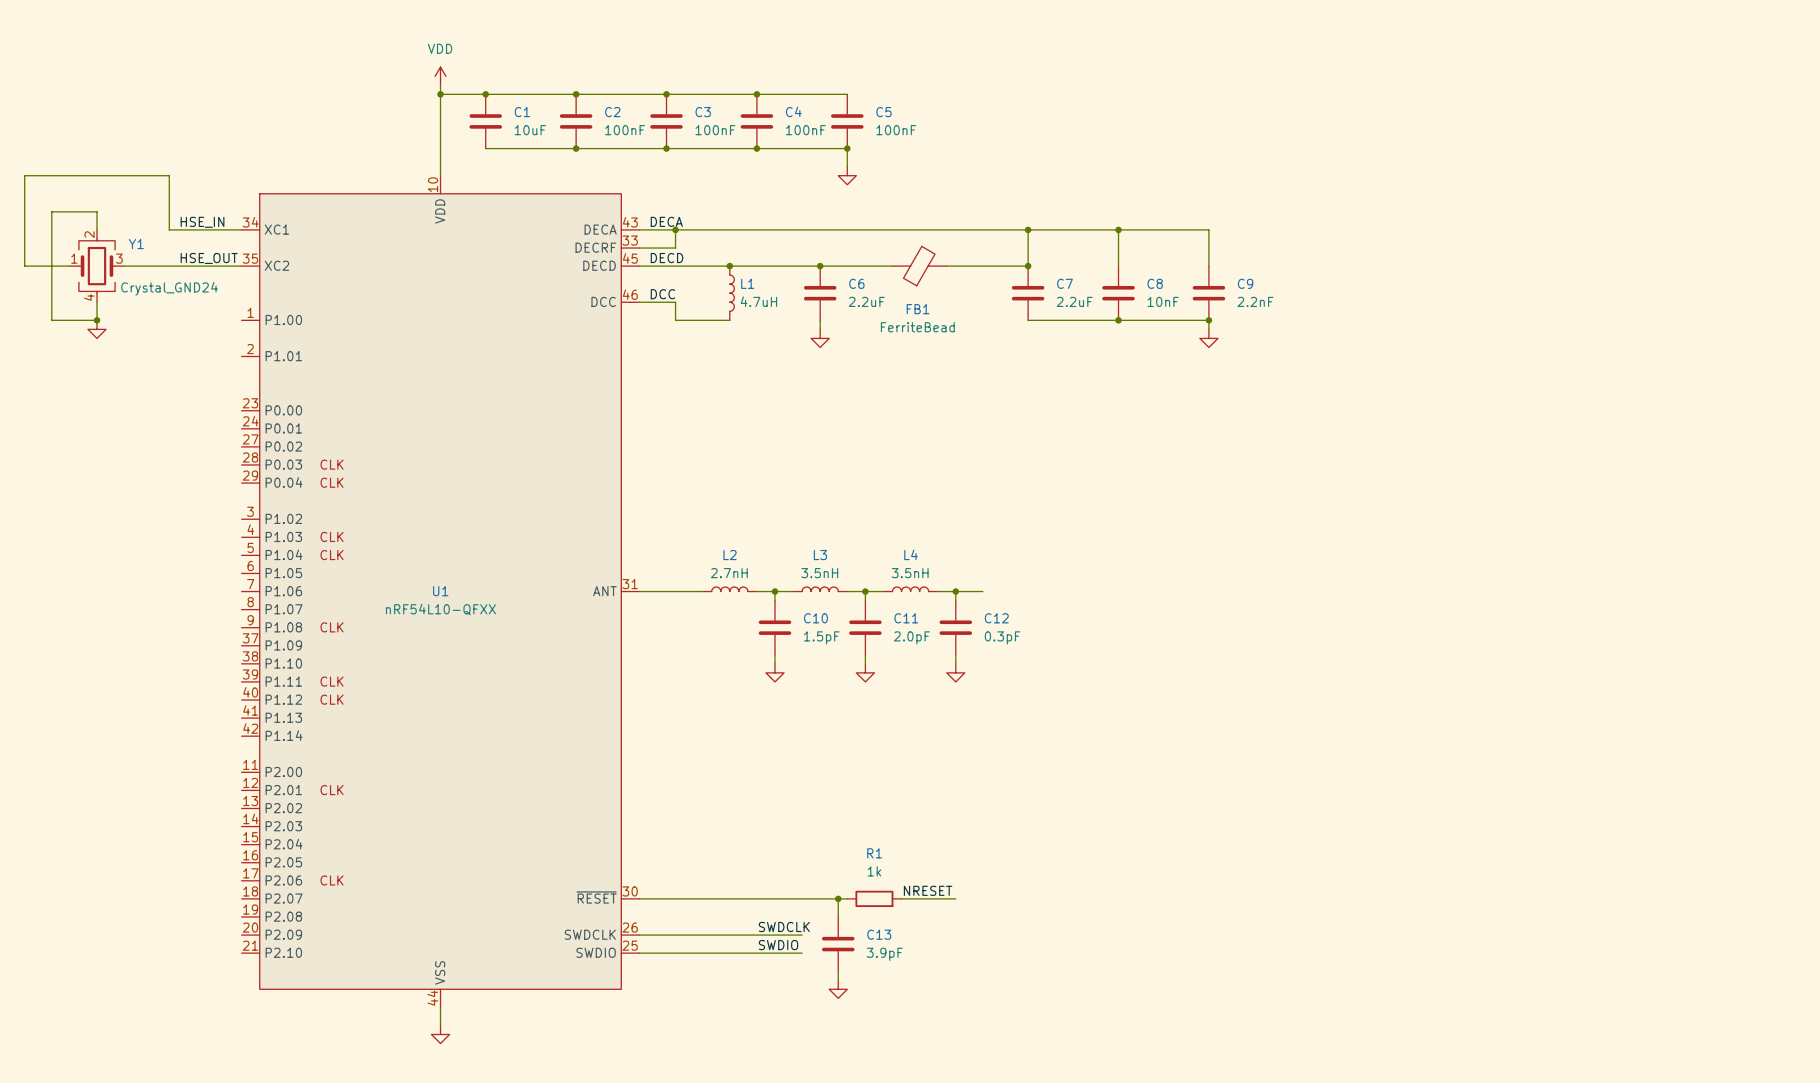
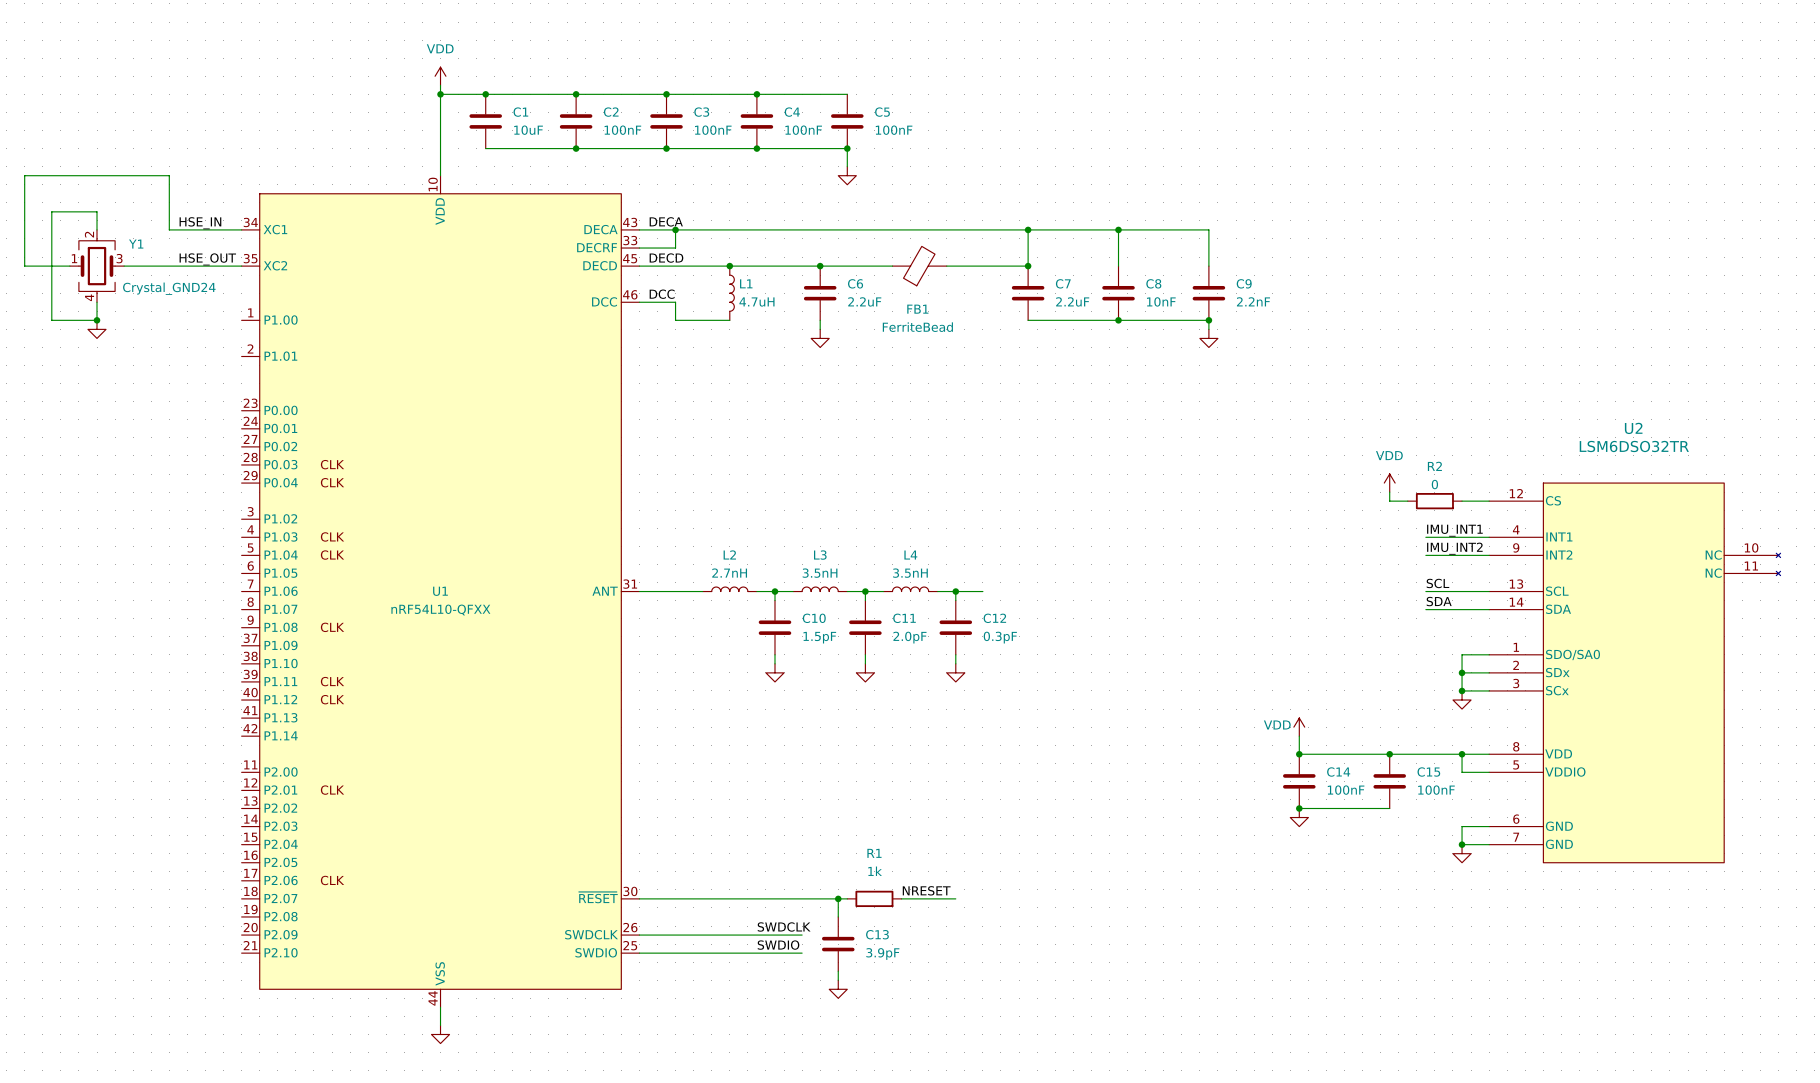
power symbol: none -> VDD (1389, 483)
wire: none -> (1389, 492) (1389, 501) (1407, 501)
R2: none -> 0 (1434, 501)
wire: none -> (1462, 501) (1489, 501)
label: none -> IMU_INT1 (1454, 530)
wire: none -> (1425, 537) (1489, 537)
label: none -> IMU_INT2 (1454, 548)
wire: none -> (1425, 555) (1489, 555)
label: none -> SCL (1437, 583)
wire: none -> (1425, 591) (1489, 591)
label: none -> SDA (1439, 601)
wire: none -> (1425, 609) (1489, 609)
wire: none -> (1489, 654) (1462, 654) (1462, 690) (1489, 690)
wire: none -> (1462, 672) (1489, 672)
junction: none -> (1462, 672)
U2: none -> LSM6DSO32TR (1634, 672)
junction: none -> (1462, 690)
power symbol: none -> (1462, 700)
power symbol: none -> VDD (1299, 727)
wire: none -> (1299, 736) (1299, 754) (1489, 754)
junction: none -> (1299, 754)
junction: none -> (1389, 754)
wire: none -> (1462, 754) (1462, 772) (1489, 772)
junction: none -> (1462, 754)
C14: none -> 100nF (1299, 781)
C15: none -> 100nF (1389, 781)
wire: none -> (1299, 808) (1389, 808)
junction: none -> (1299, 808)
power symbol: none -> (1299, 817)
wire: none -> (1489, 826) (1462, 826) (1462, 844) (1489, 844)
junction: none -> (1462, 844)
power symbol: none -> (1462, 853)

